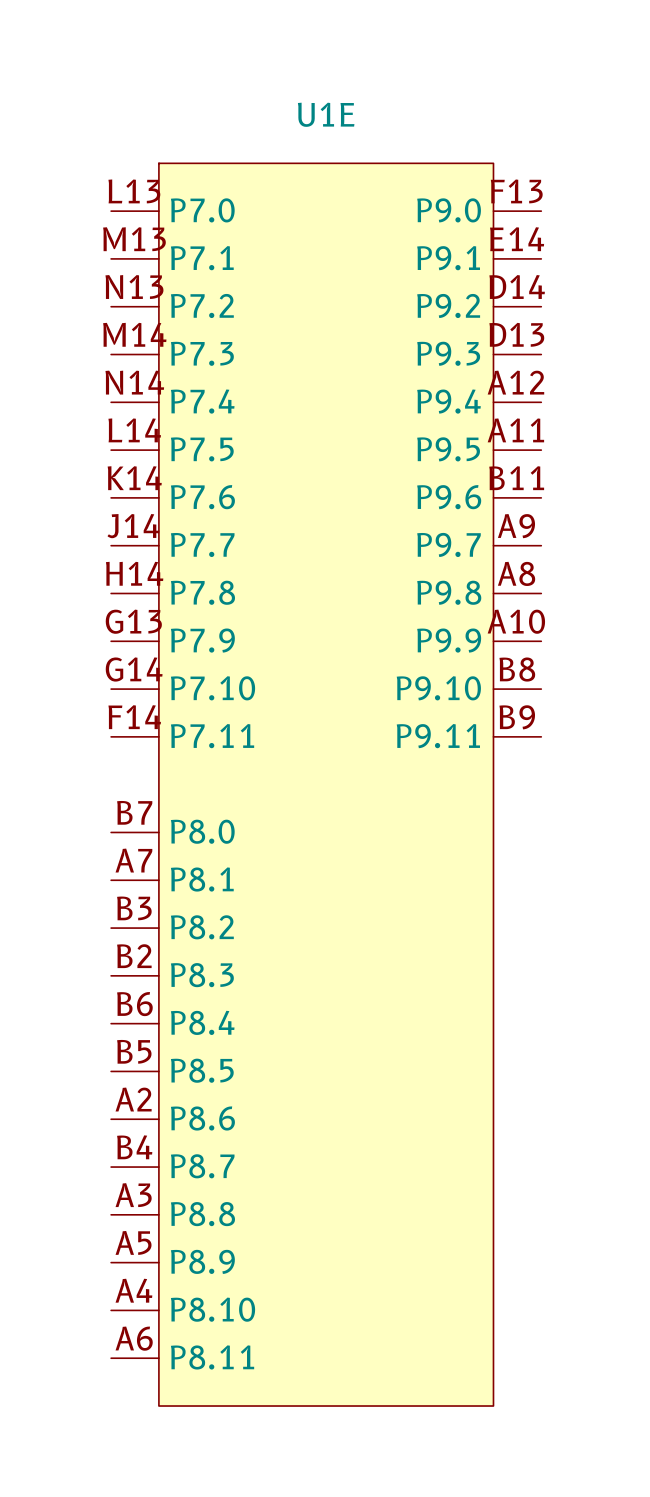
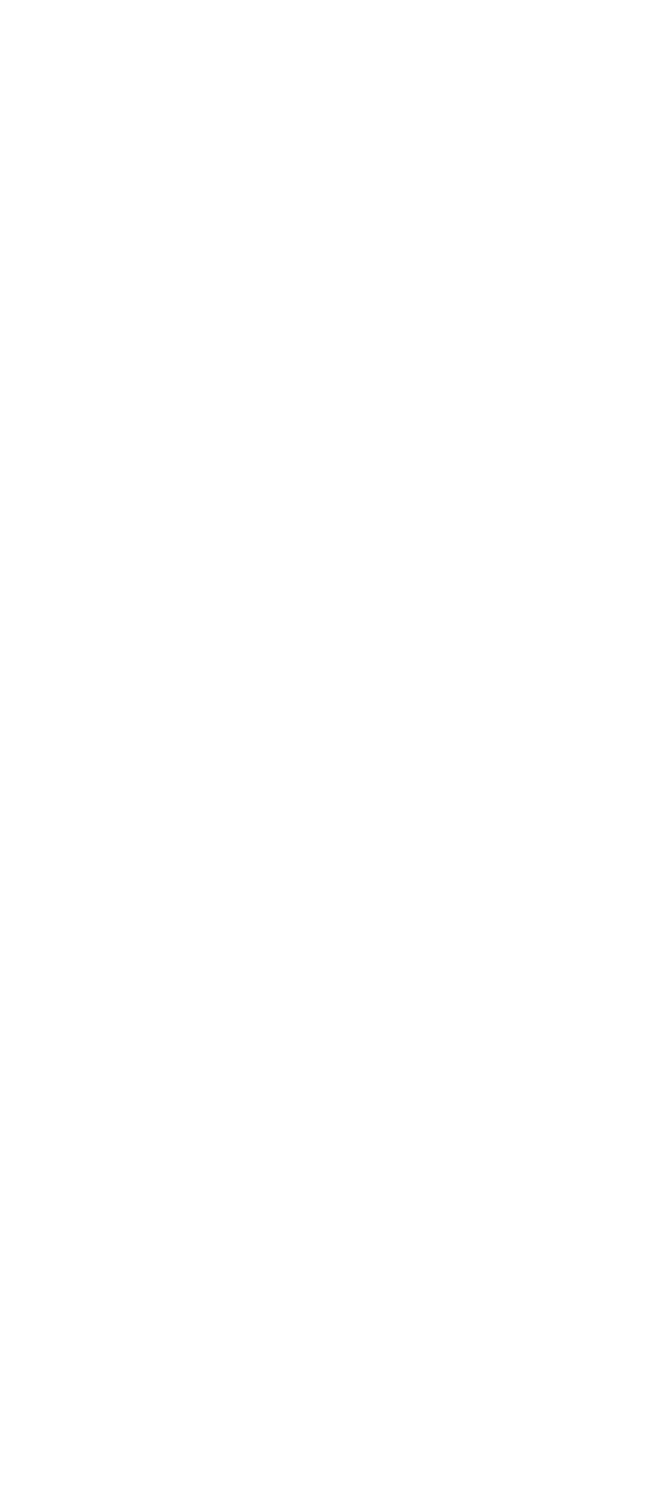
U1E: (326, 784) -> none

